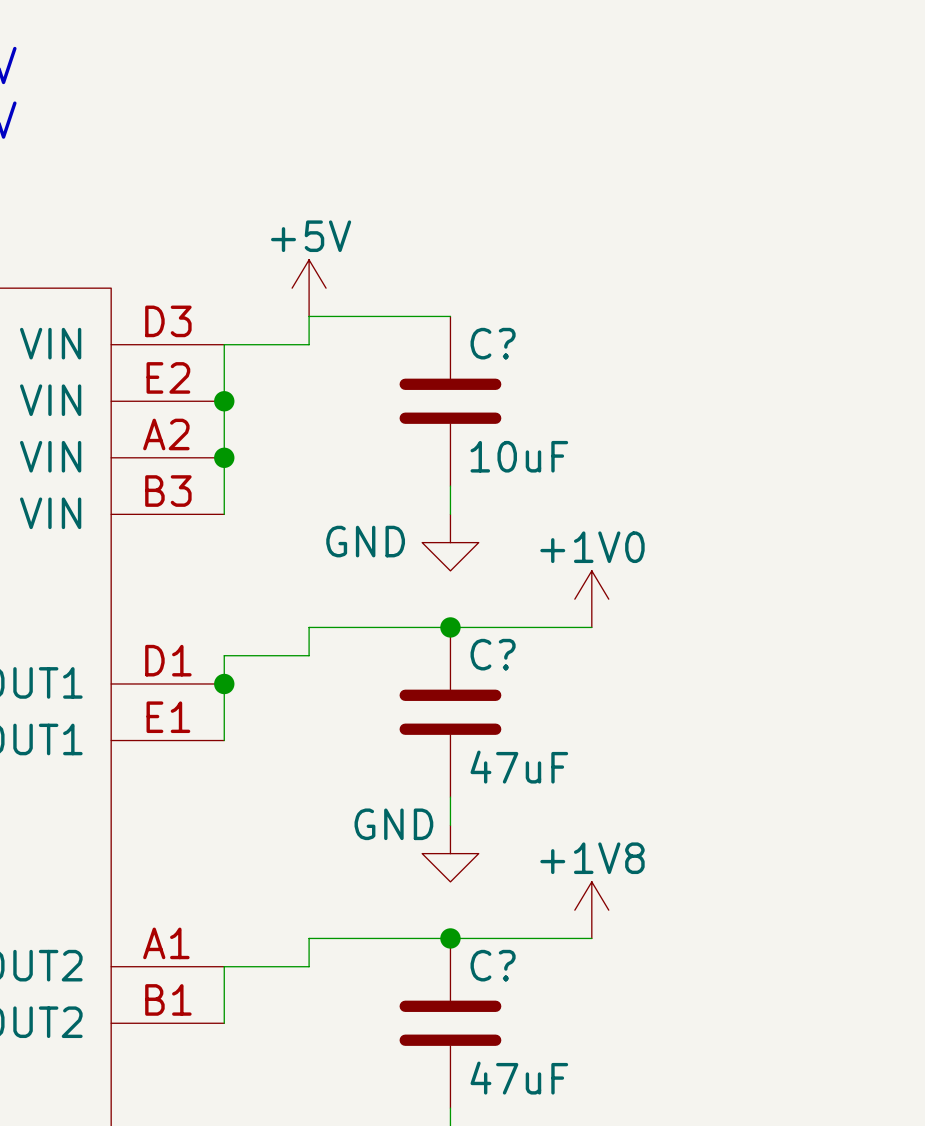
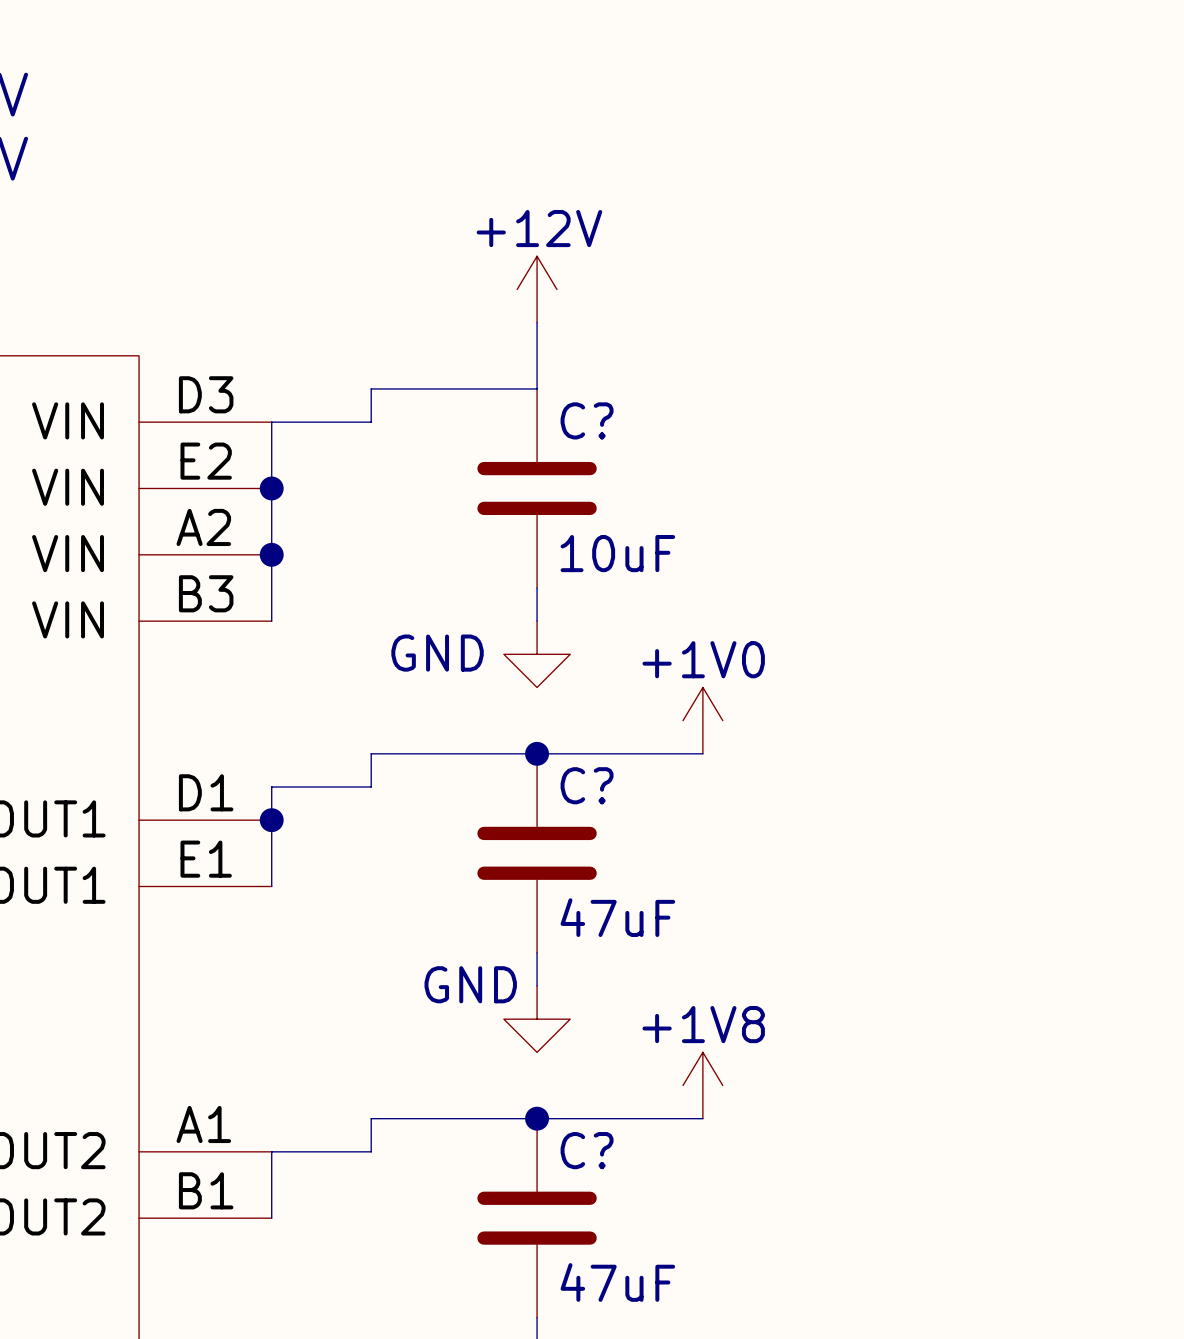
power symbol: none -> +12V (537, 289)
wire: none -> (537, 322) (537, 388)
power symbol: +5V (309, 288) -> none

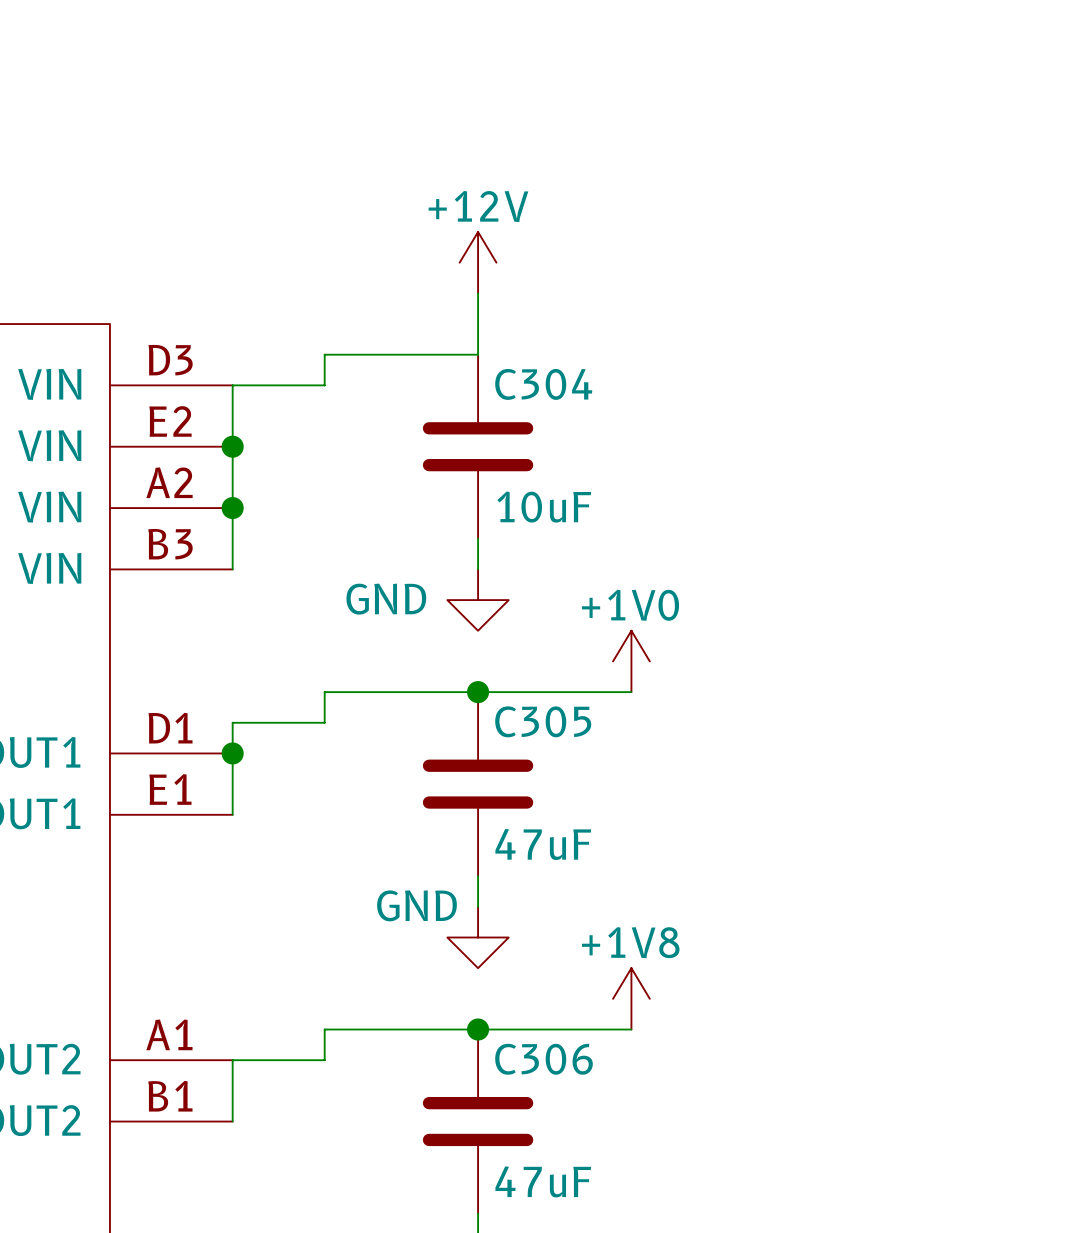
C? name: C? (587, 420) -> C304 (543, 384)
C? name: C? (587, 785) -> C305 (543, 721)
C? name: C? (587, 1150) -> C306 (544, 1059)

